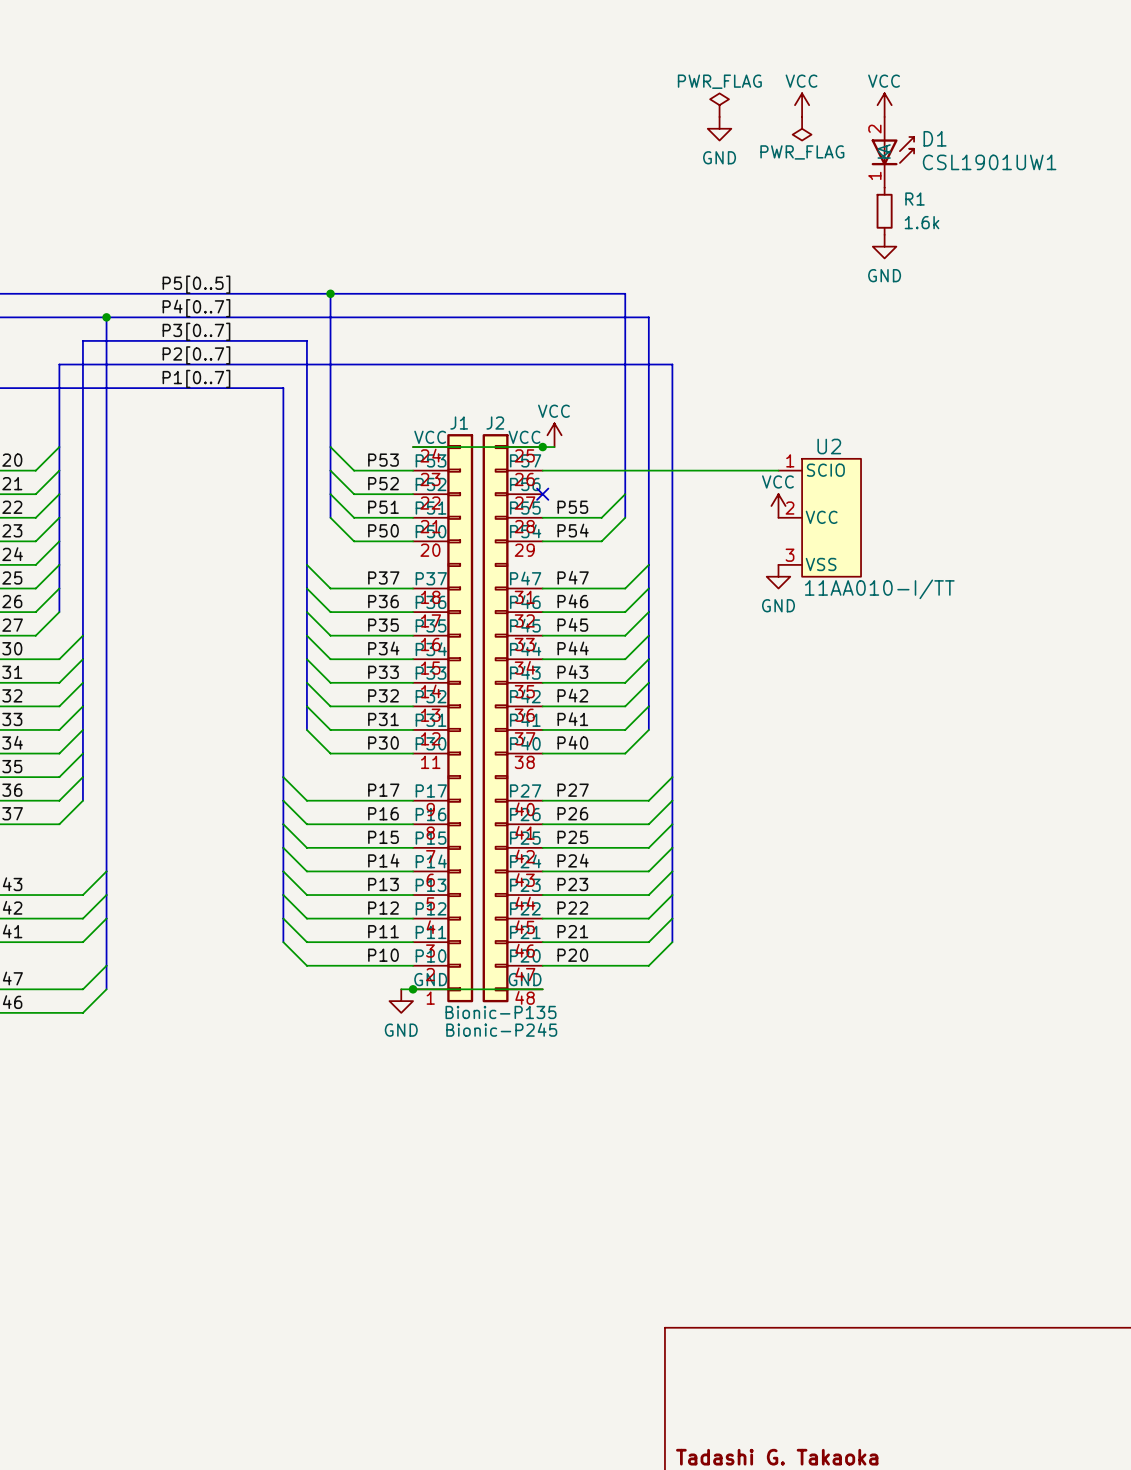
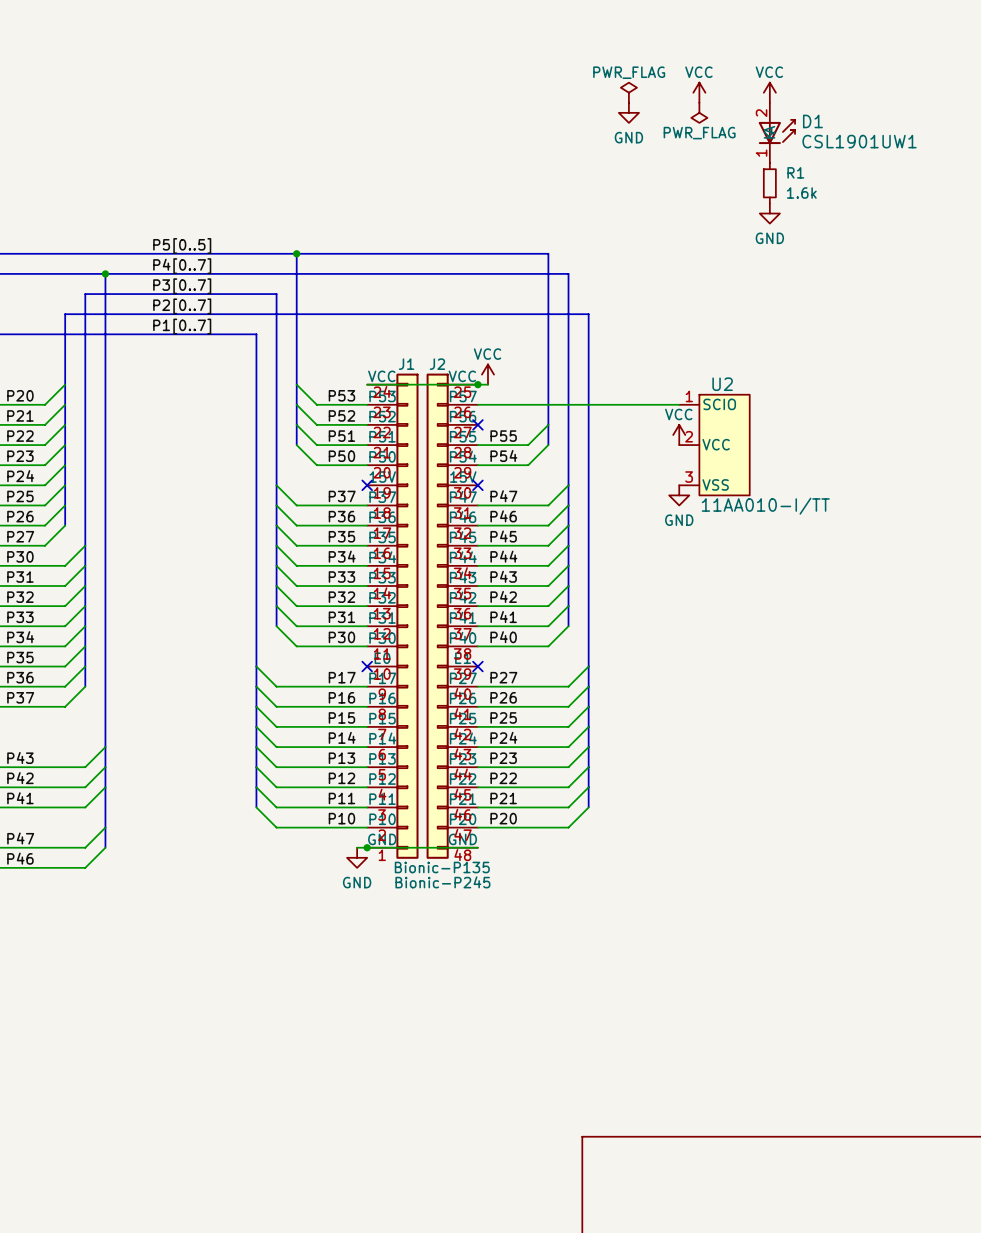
J1 symbol: [413, 434, 474, 1003] -> [367, 373, 419, 859]
J2 symbol: [482, 434, 543, 1003] -> [426, 373, 478, 859]
no-connect mark: none -> (367, 485)
no-connect mark: none -> (477, 485)
no-connect mark: none -> (367, 666)
no-connect mark: none -> (477, 666)

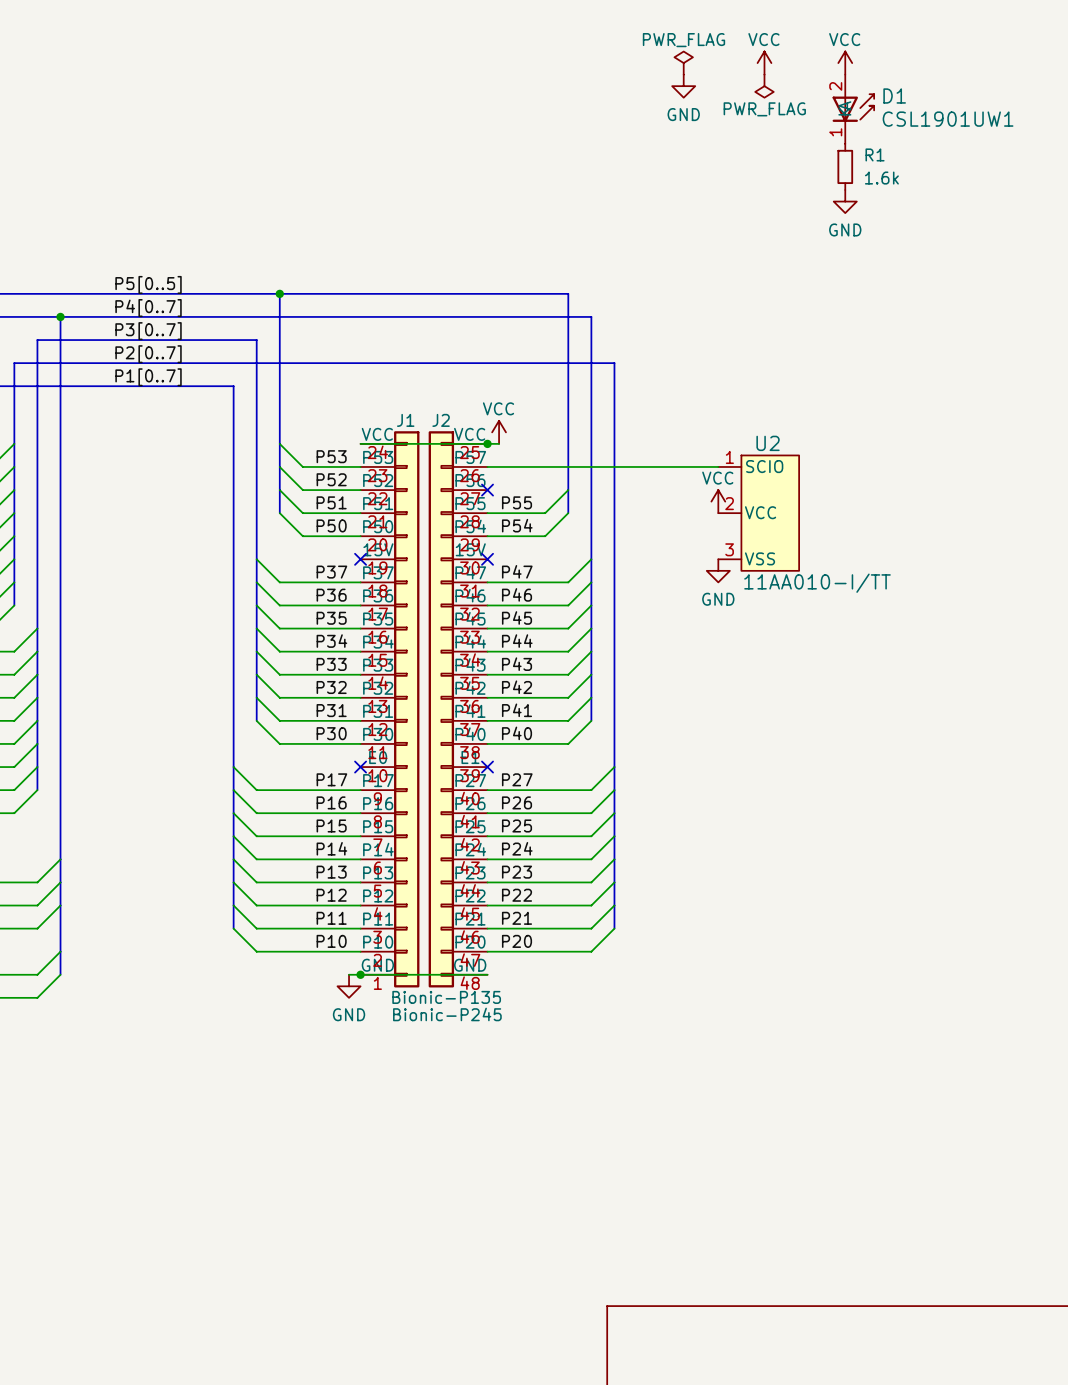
power symbol: none -> PWR_FLAG (683, 63)
power symbol: none -> VCC (764, 63)
power symbol: none -> VCC (845, 63)
power symbol: none -> PWR_FLAG (764, 86)
power symbol: PWR_FLAG (628, 92) -> none
power symbol: VCC (699, 92) -> none
power symbol: VCC (769, 92) -> none
power symbol position: GND (628, 112) -> GND (683, 86)
power symbol: PWR_FLAG (699, 112) -> none
D1 position: (776, 132) -> (853, 109)
R1 position: (769, 183) -> (845, 166)
power symbol position: GND (769, 213) -> GND (845, 201)

